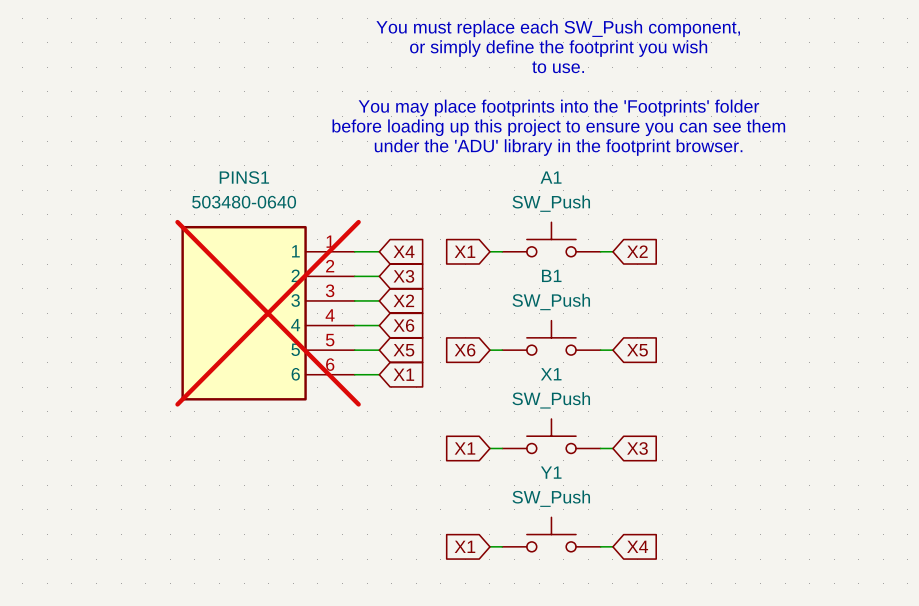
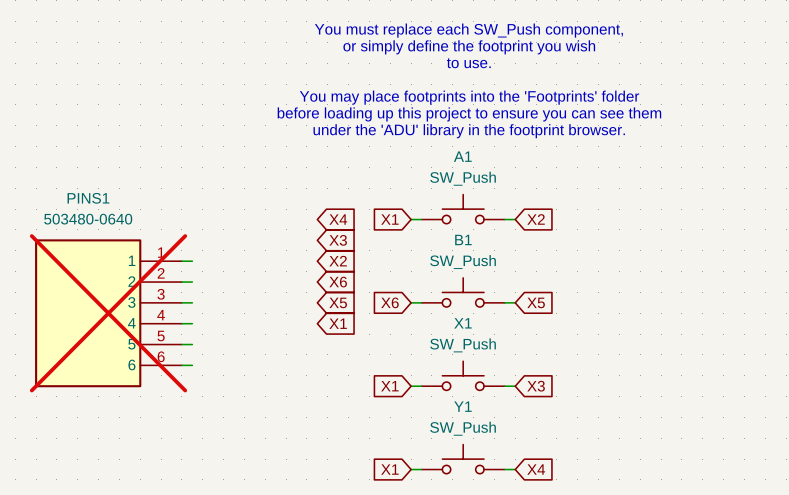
wire: (354, 251) (379, 251) -> none
wire: (354, 276) (379, 276) -> none
wire: (354, 300) (379, 300) -> none
PINS1 position: (268, 313) -> (108, 313)
wire: (354, 325) (379, 325) -> none
wire: (354, 350) (379, 350) -> none
wire: (354, 374) (379, 374) -> none
wire: none -> (181, 365) (192, 365)

